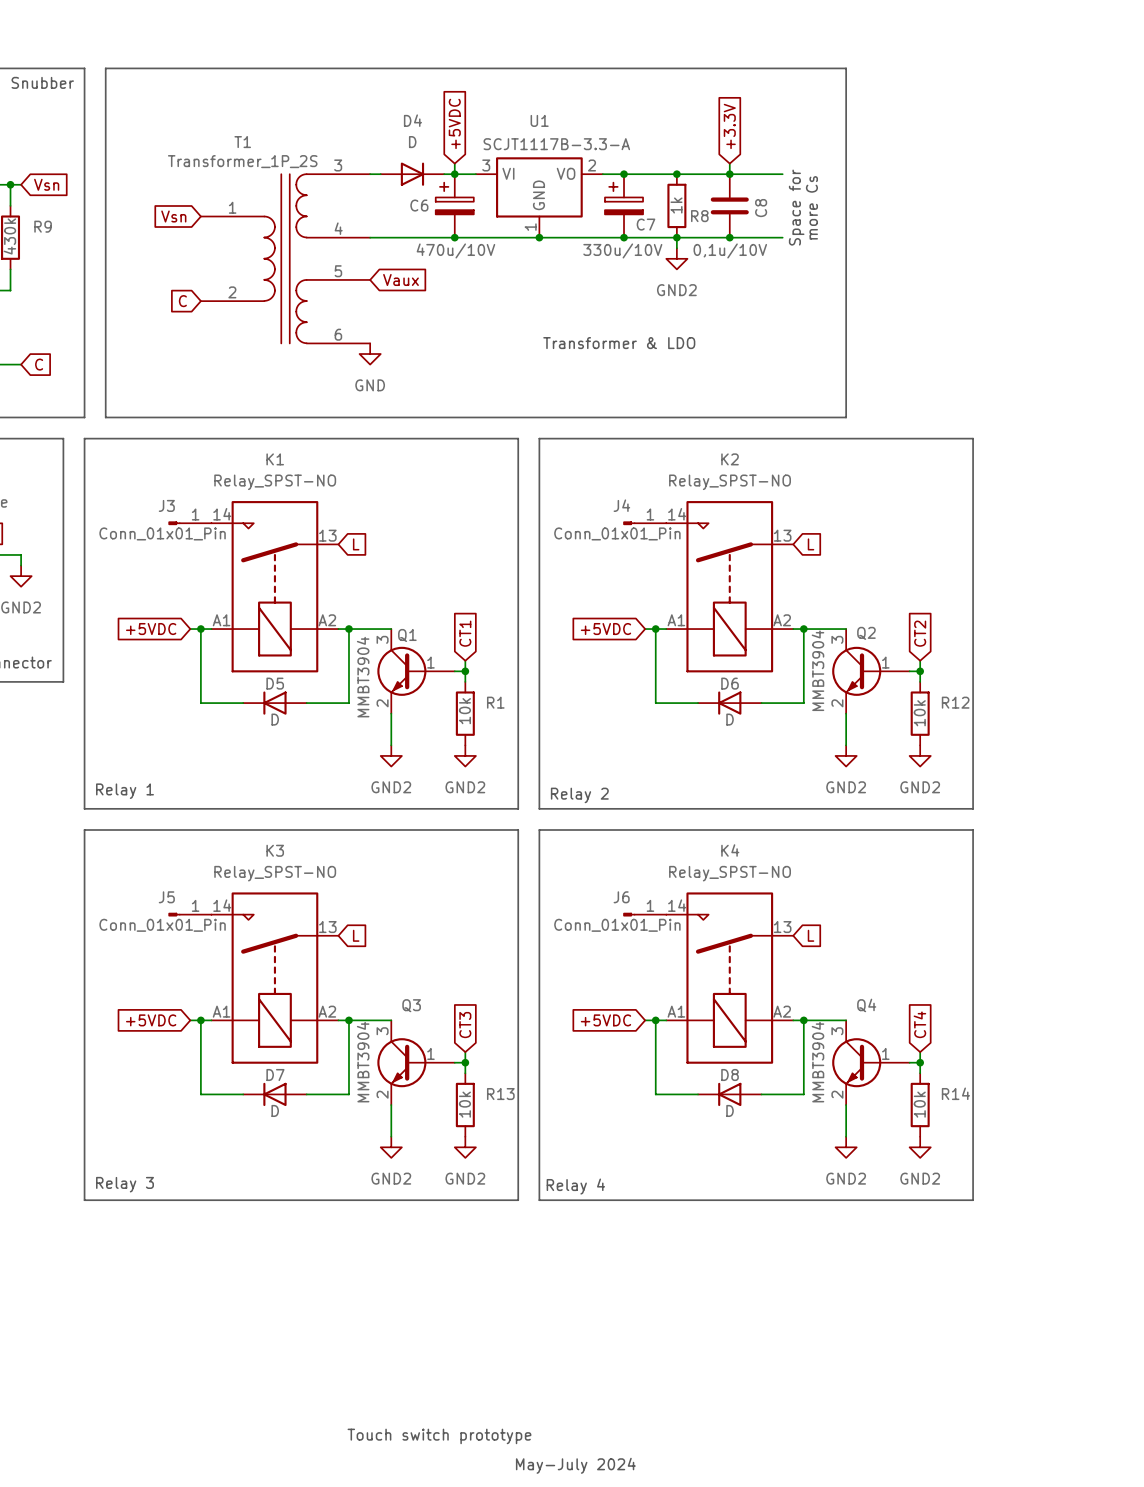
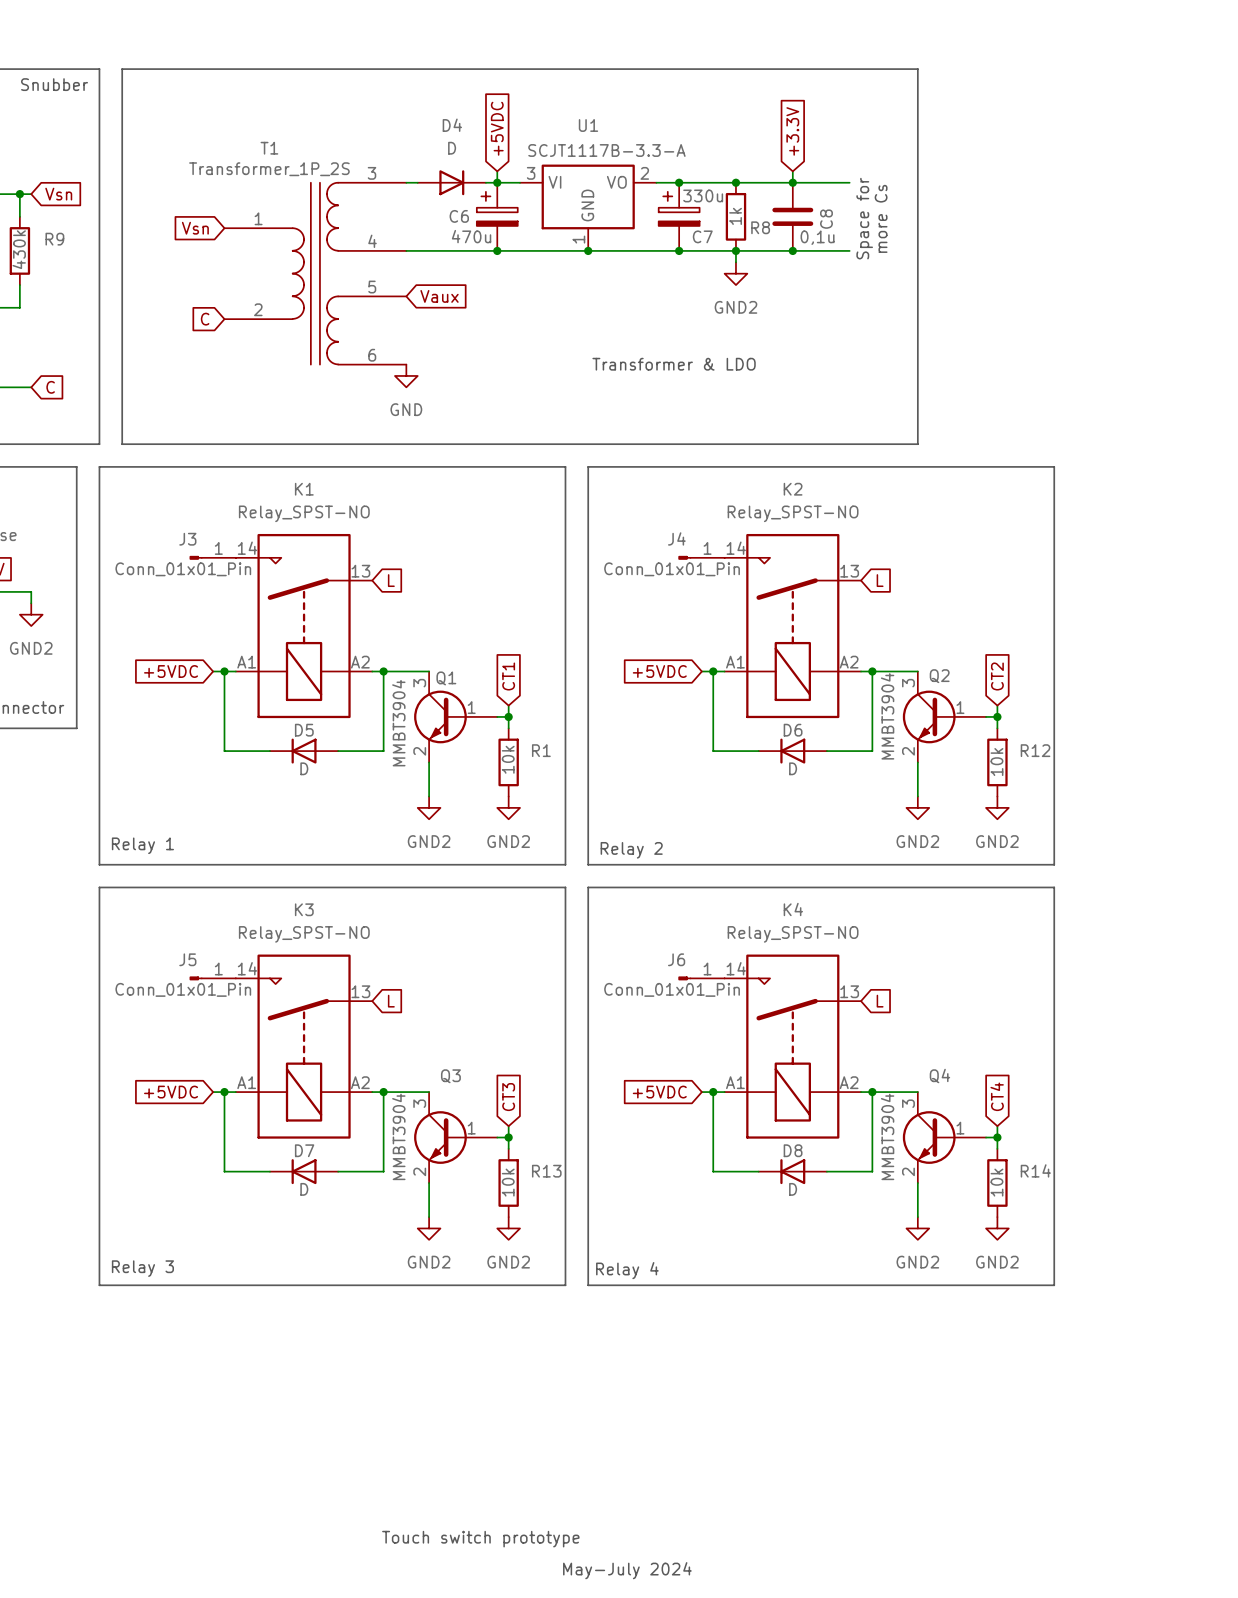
C6 value: 470u/10V (455, 250) -> 470u (471, 236)
C7 value: 330u/10V (622, 250) -> 330u (703, 195)
C8 value: 0,1u/10V (730, 250) -> 0,1u (817, 237)

